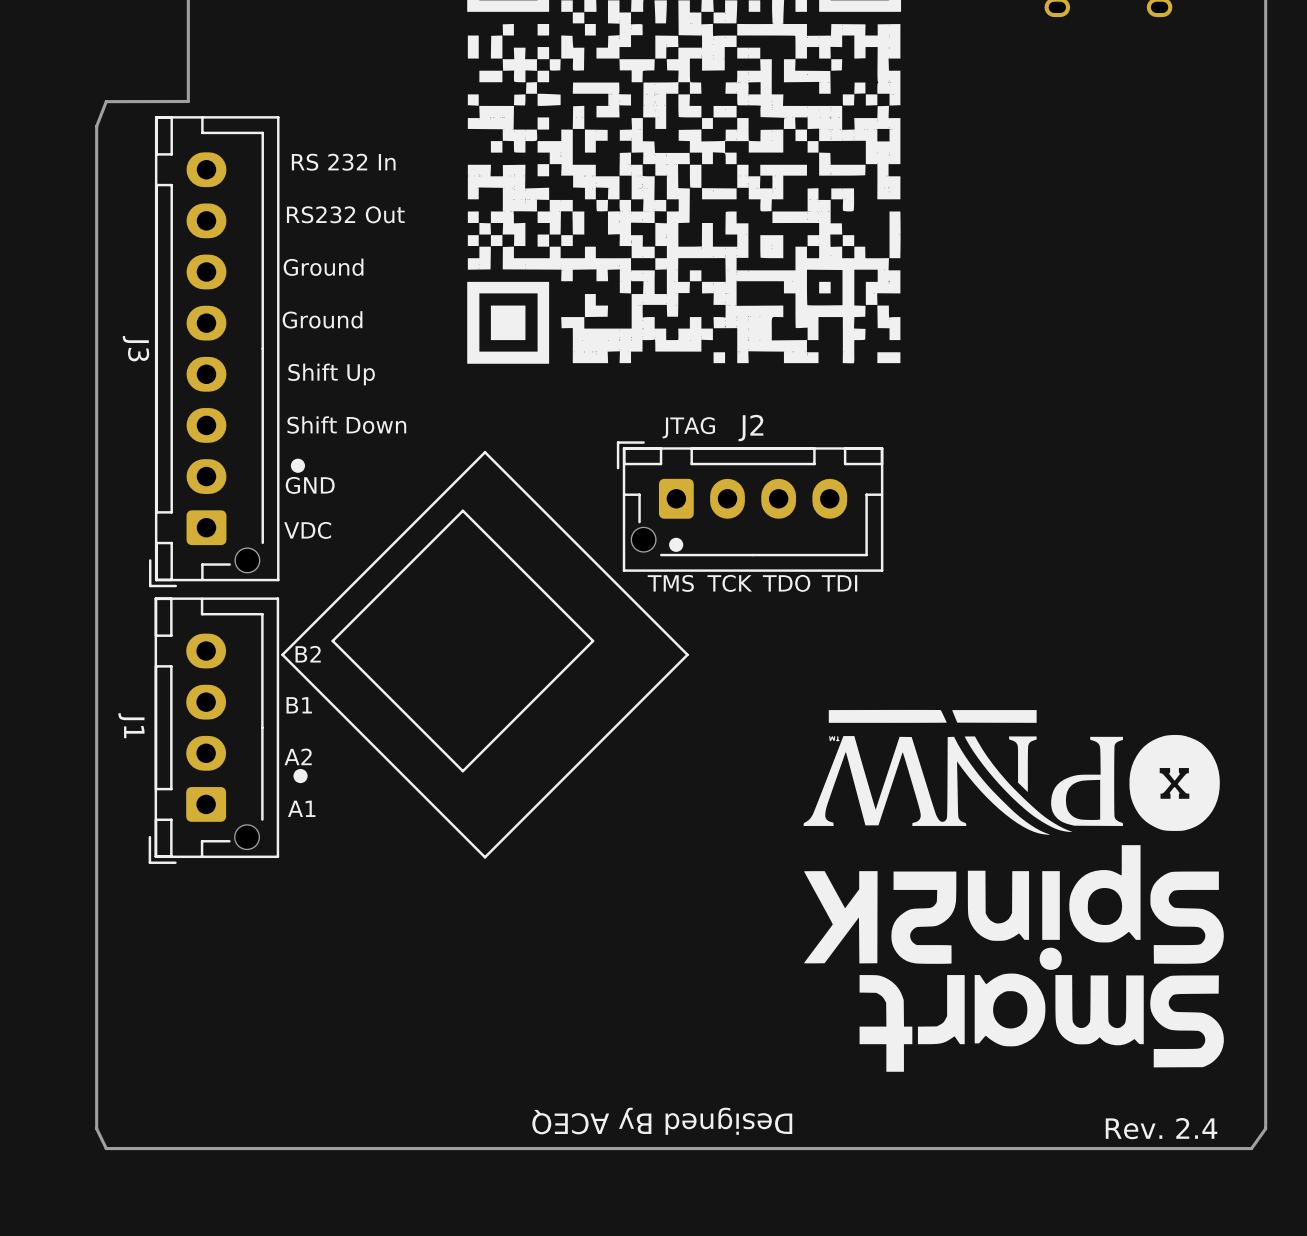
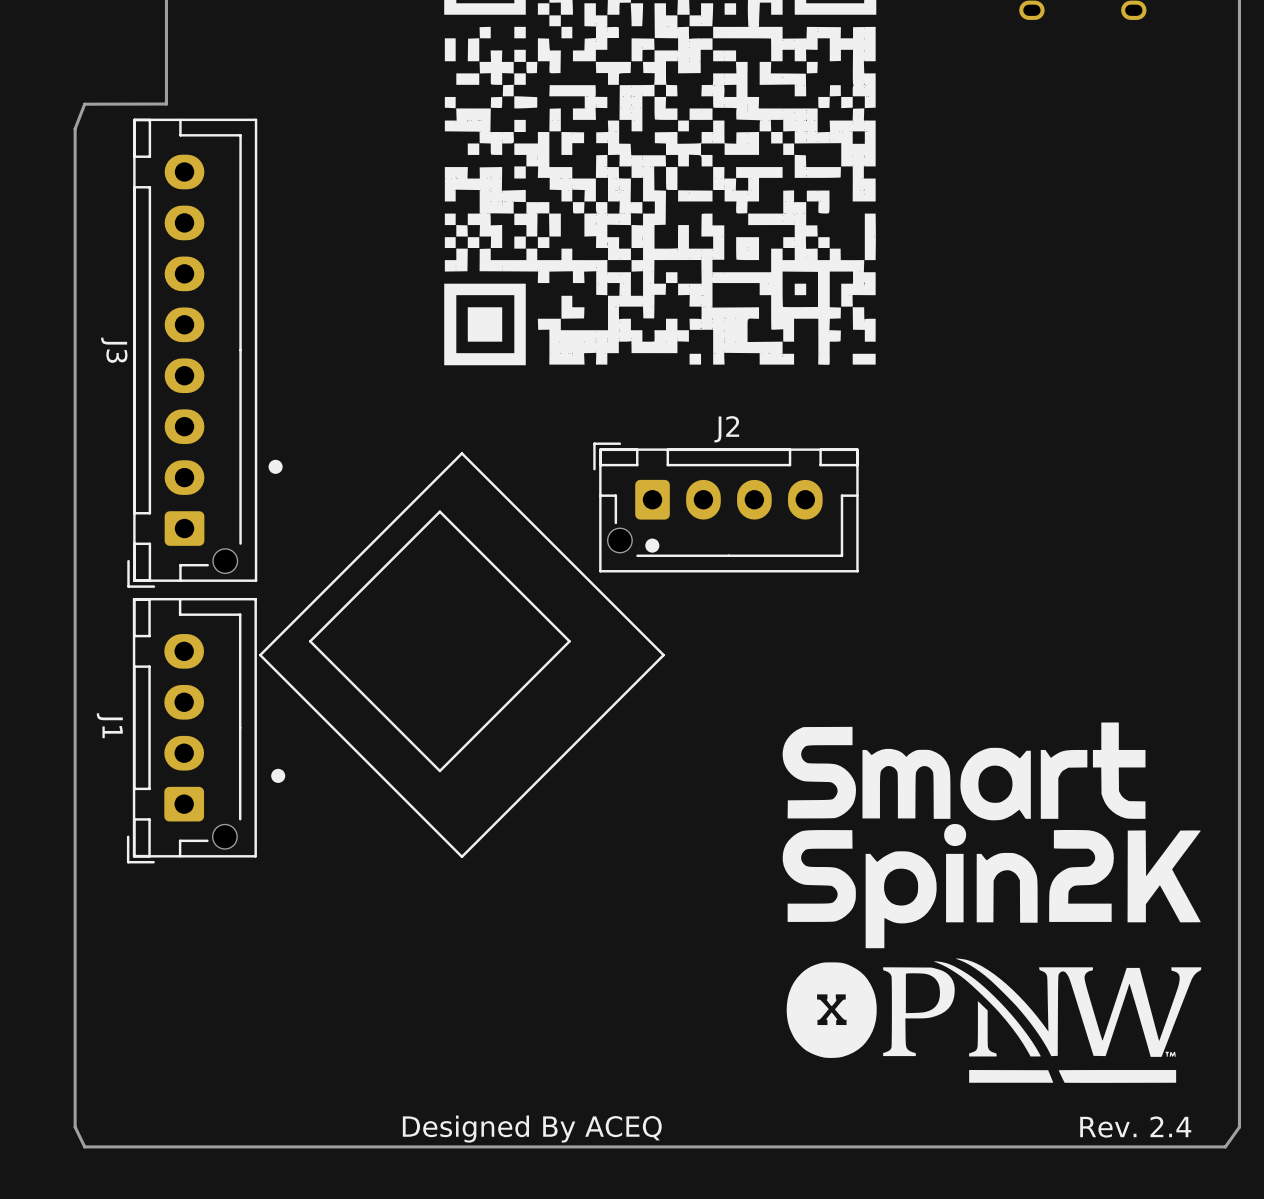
text: RS 232 In (343, 162) -> none
text: RS232 Out (345, 214) -> none
text: Ground (323, 267) -> none
text: Ground (322, 319) -> none
text: Shift Up (331, 374) -> none
text: Shift Down (346, 425) -> none
text: JTAG (688, 427) -> none
text: GND (310, 485) -> none
text: VDC (307, 530) -> none
text: TMS (670, 583) -> none
text: TCK (729, 583) -> none
text: TDO (786, 583) -> none
text: TDI (839, 583) -> none
text: B2 (308, 654) -> none
text: B1 (299, 705) -> none
drawing shape: [803, 709, 1224, 1072] -> [782, 722, 1202, 1083]
text: A2 (298, 756) -> none
text: A1 (301, 808) -> none
text rotation: 0° (662, 1121) -> 180° (532, 1129)

